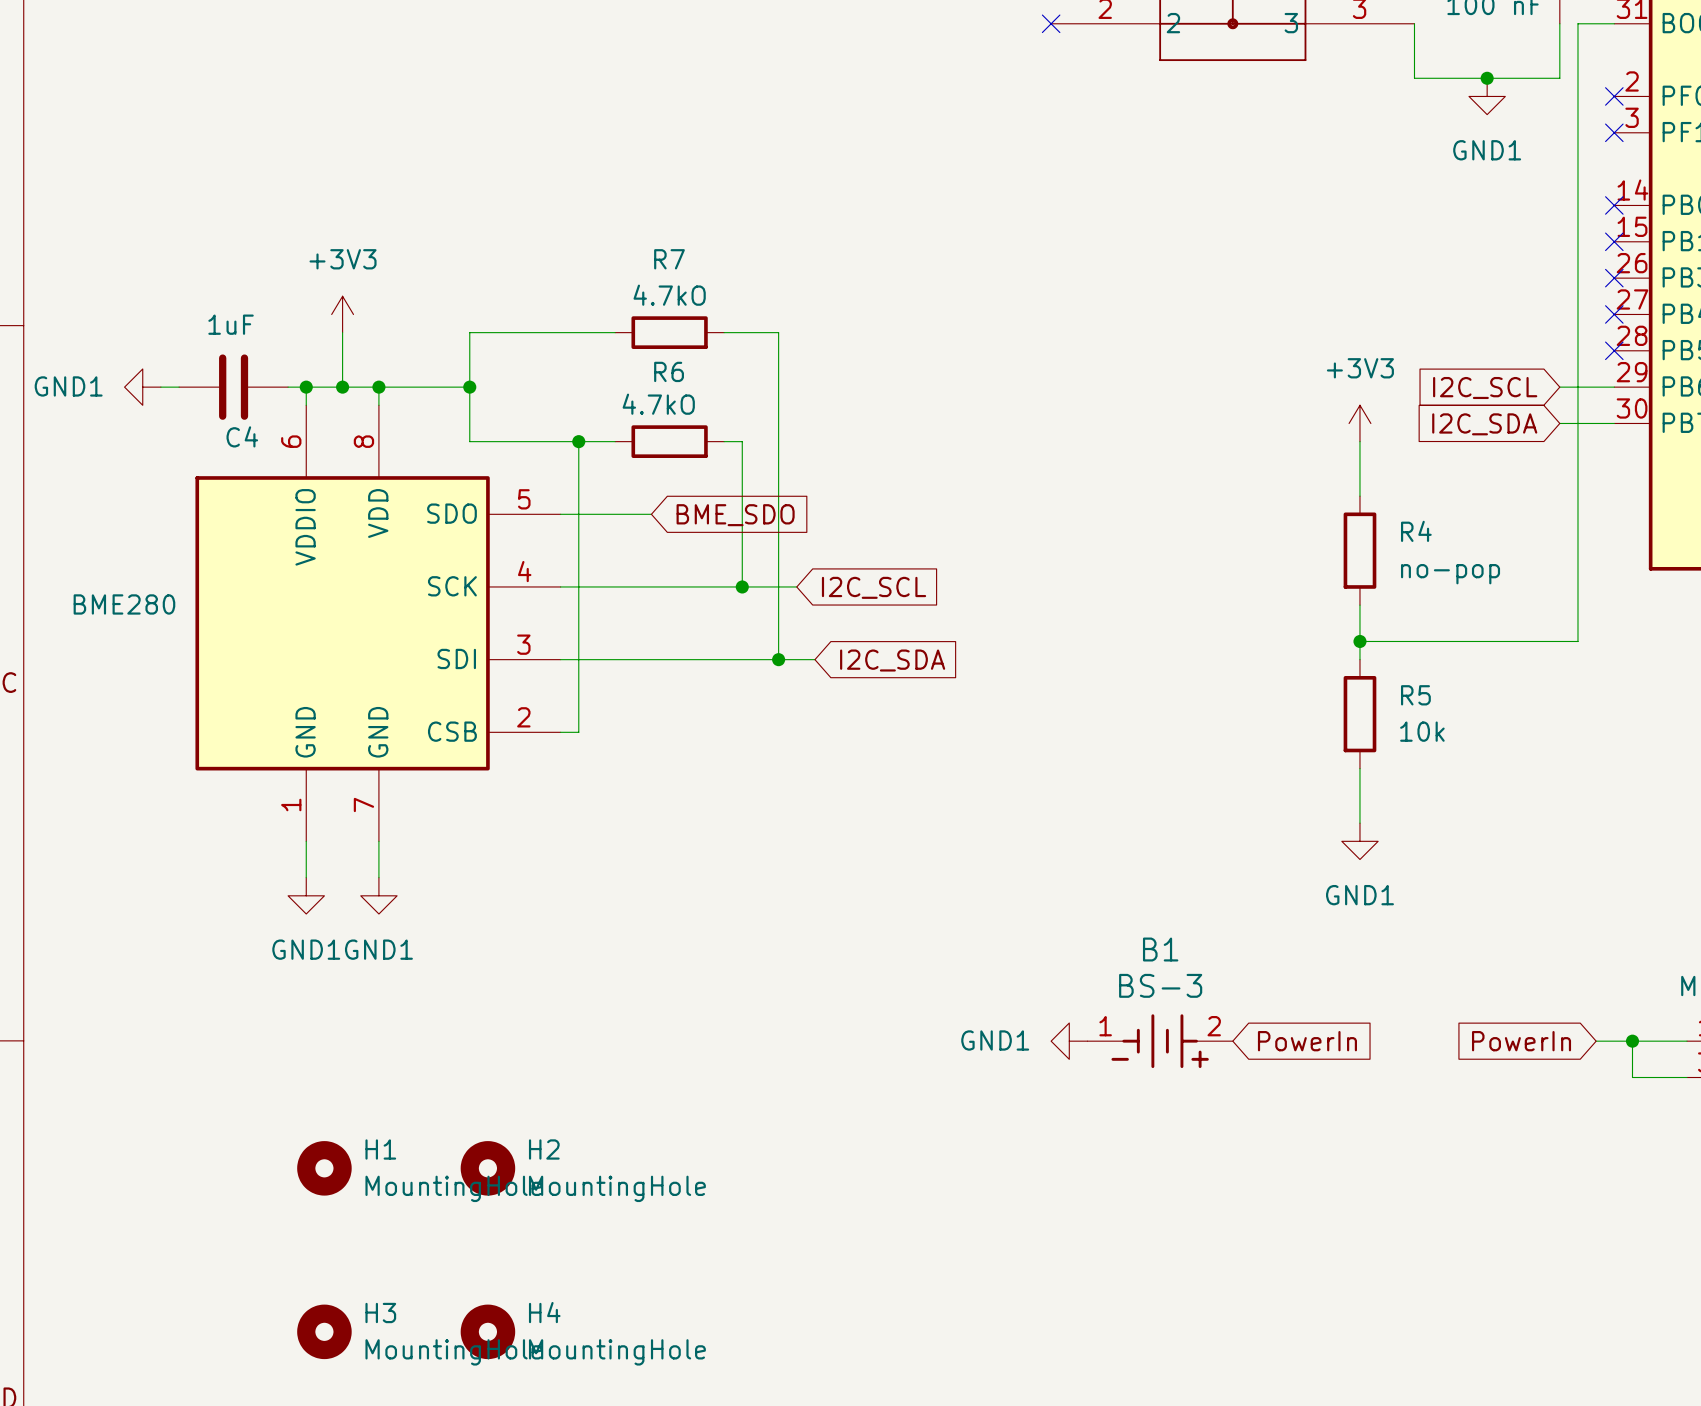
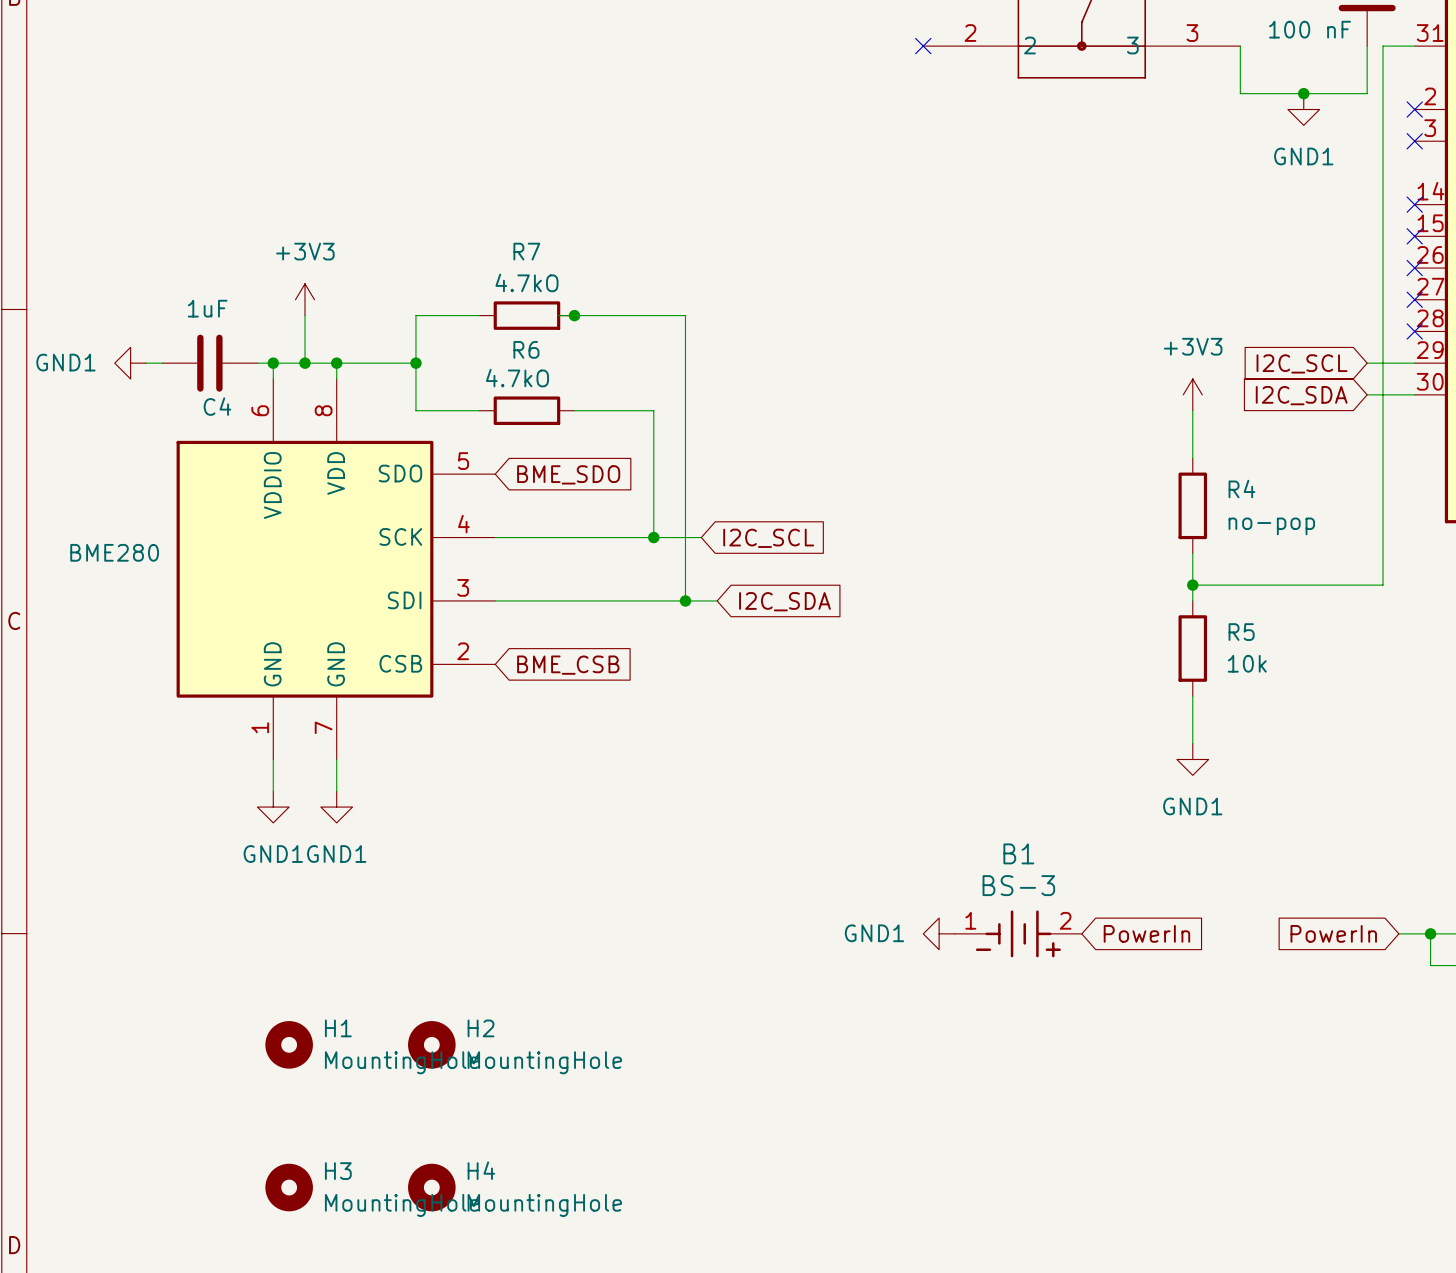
wire: (542, 332) (615, 332) -> none
junction: none -> (574, 315)
R7 position: (669, 332) -> (526, 315)
wire: (542, 441) (615, 441) -> (574, 410) (637, 410)
wire: (578, 441) (578, 732) (560, 732) -> none
junction: (578, 441) -> none
R6 position: (669, 441) -> (526, 410)
wire: (560, 514) (651, 514) -> (558, 315) (637, 315)
global label position: BME_SDO (735, 515) -> BME_SDO (568, 474)
global label: none -> BME_CSB (568, 665)

